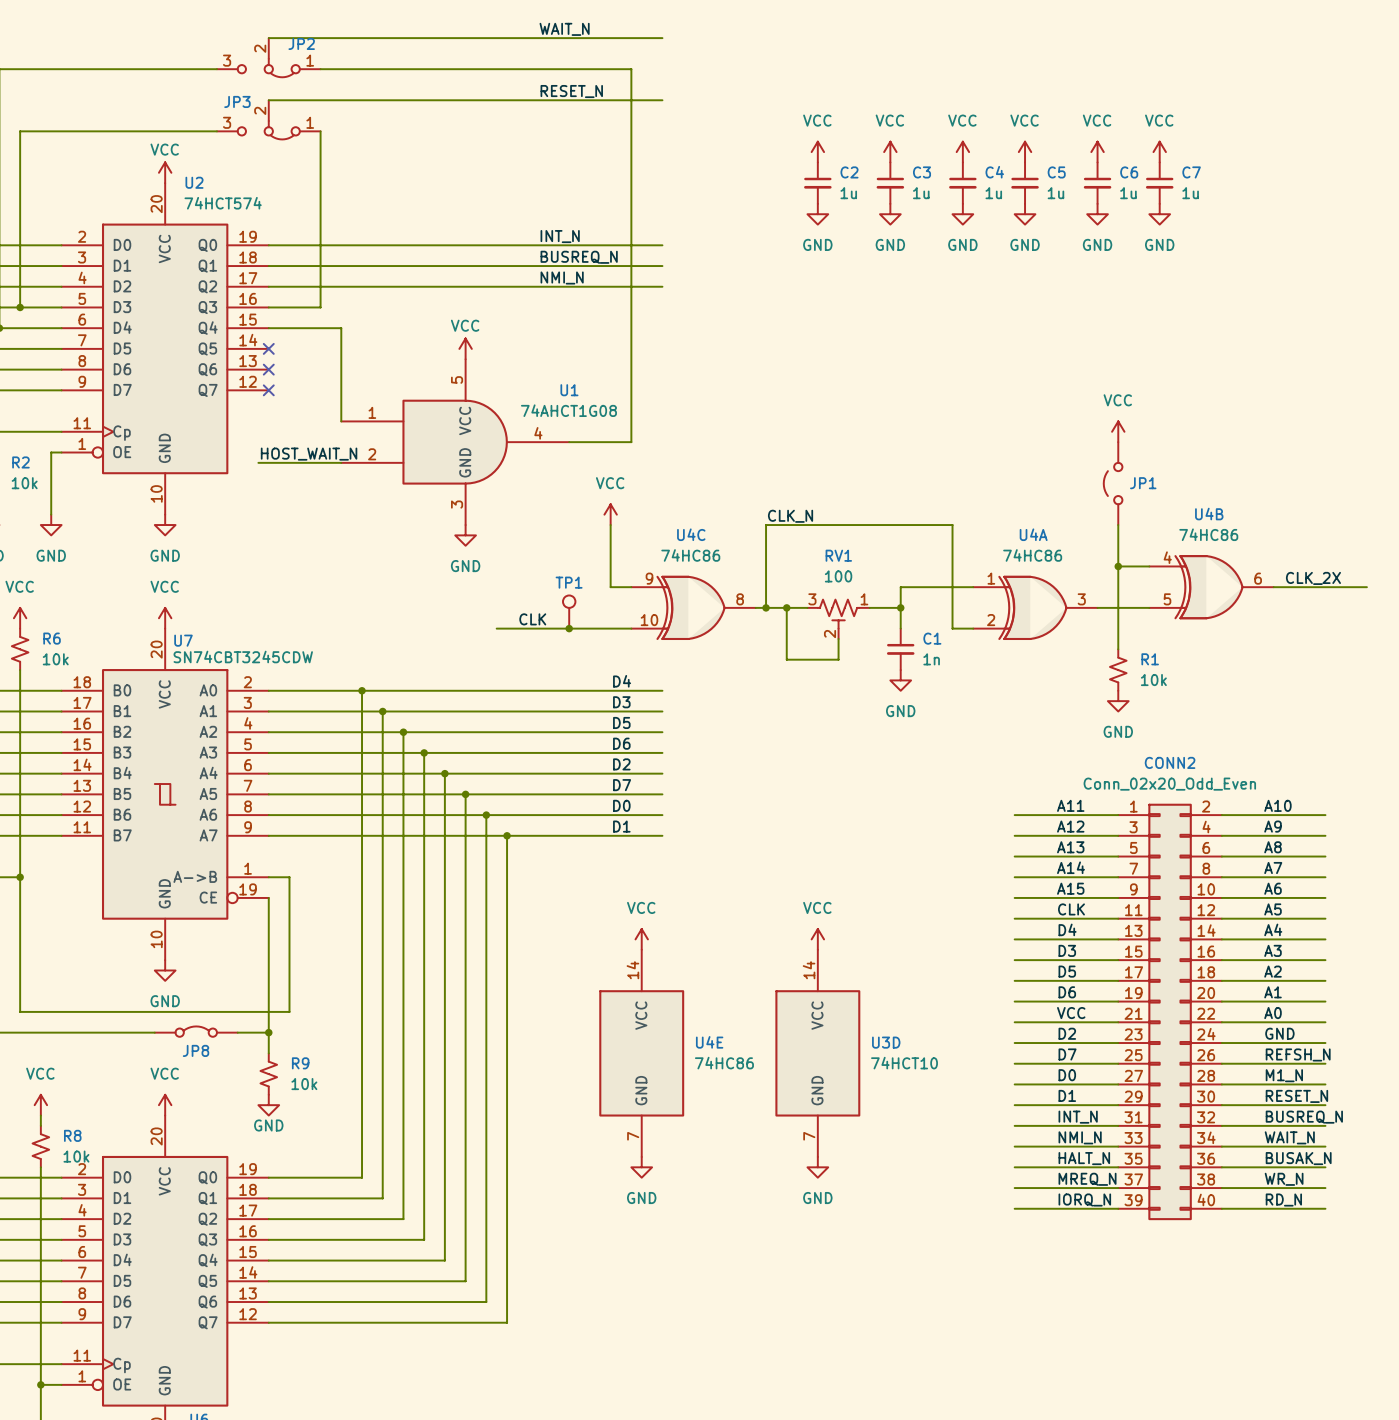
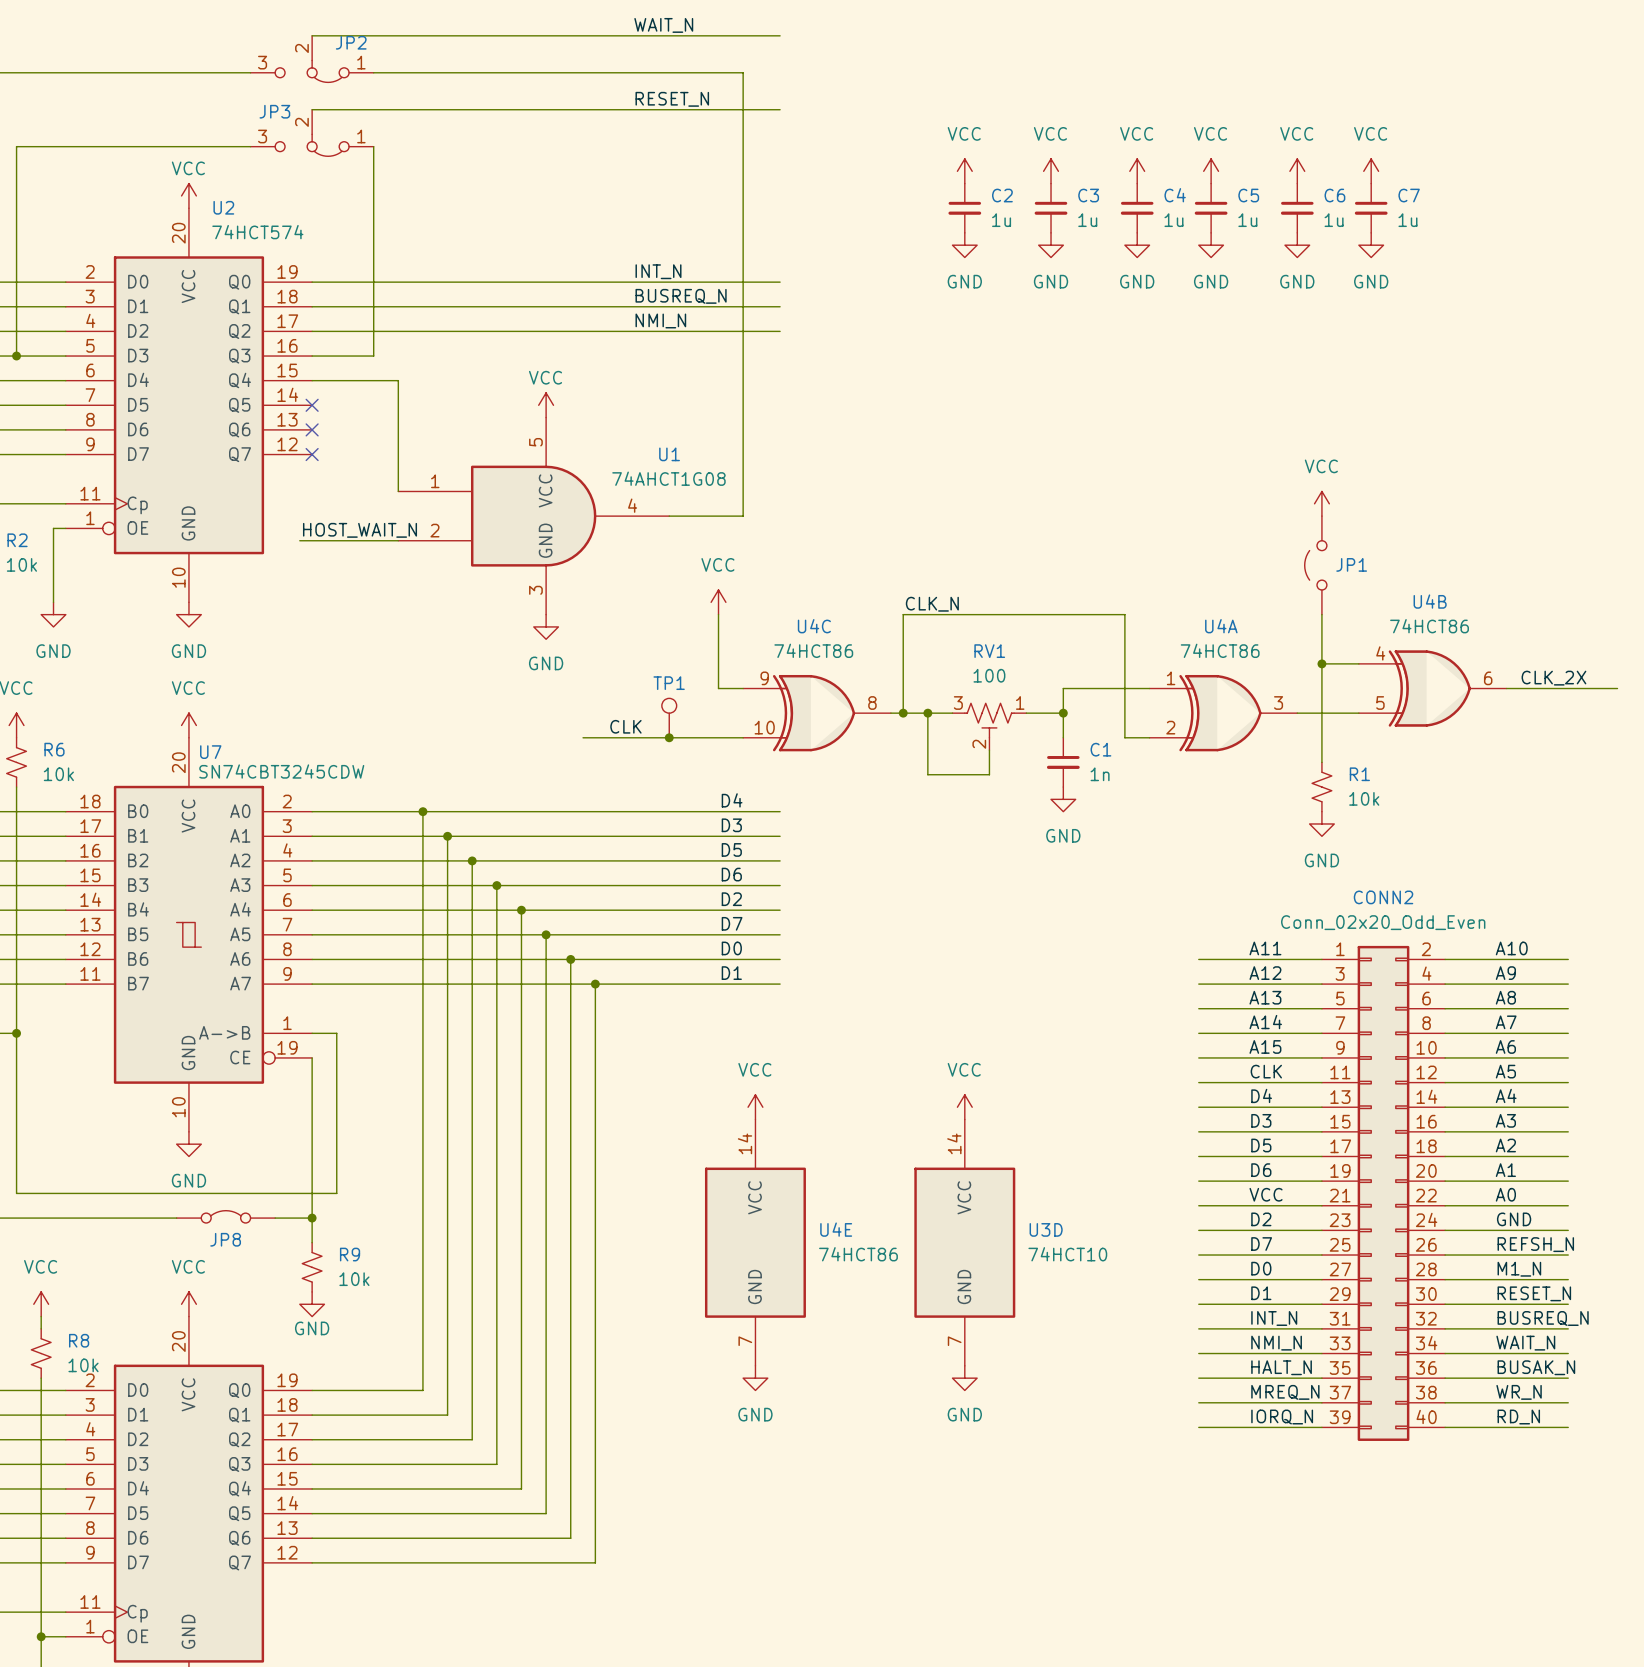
U4B value: 74HC86 (1208, 534) -> 74HCT86 (1429, 626)
U4C value: 74HC86 (690, 555) -> 74HCT86 (813, 650)
U4A value: 74HC86 (1032, 555) -> 74HCT86 (1220, 650)
U4E value: 74HC86 (724, 1063) -> 74HCT86 (858, 1254)

